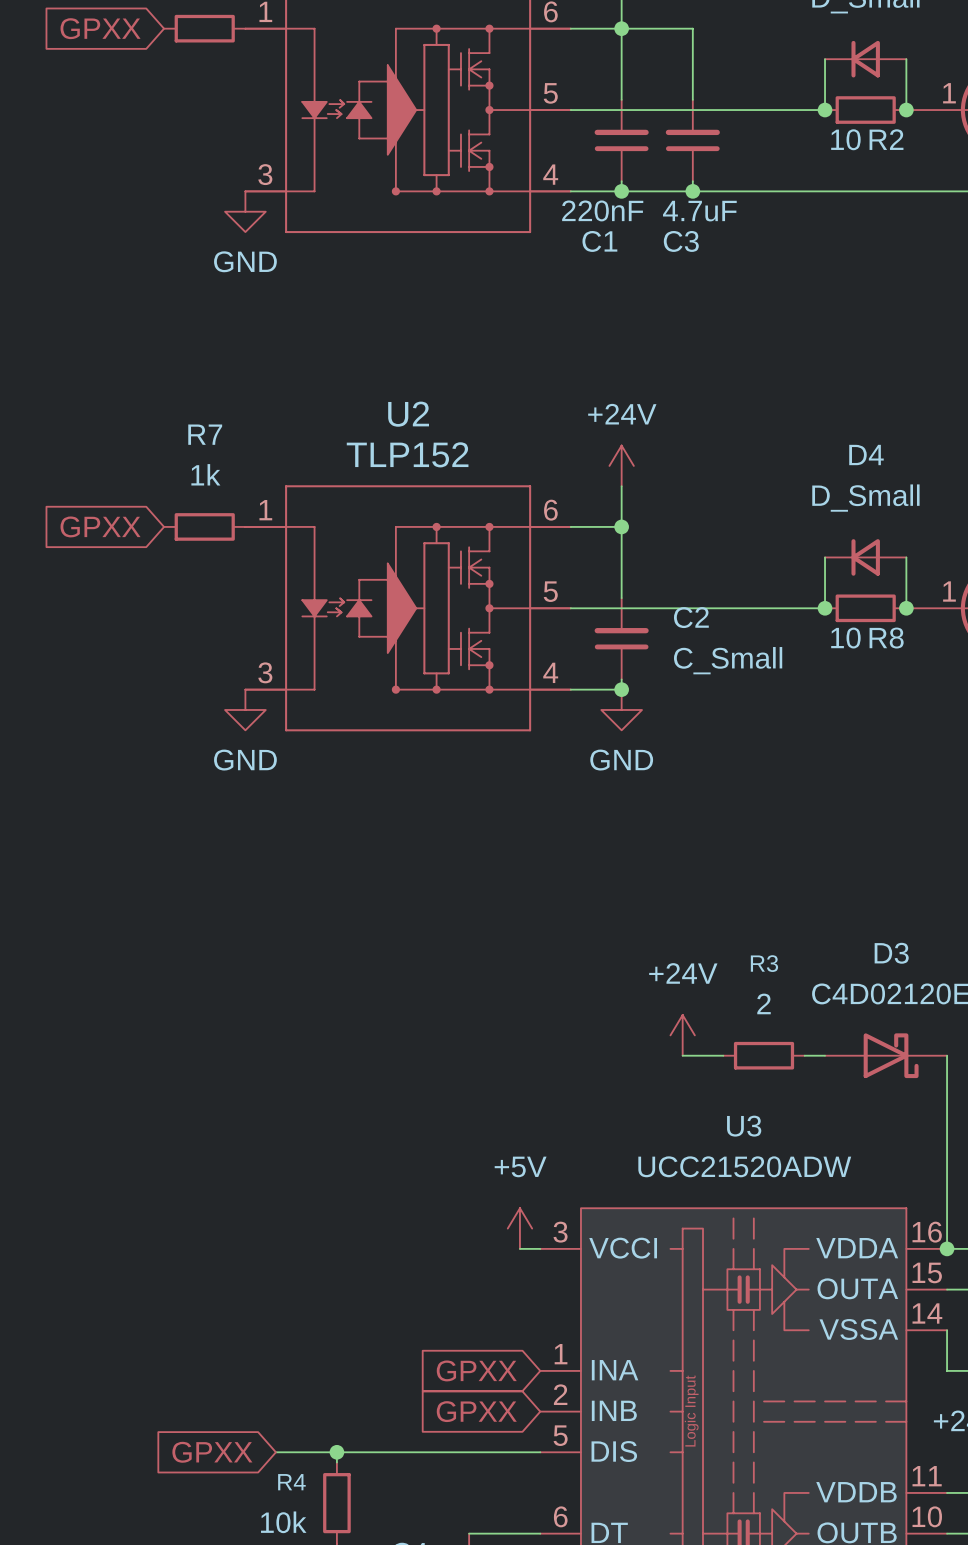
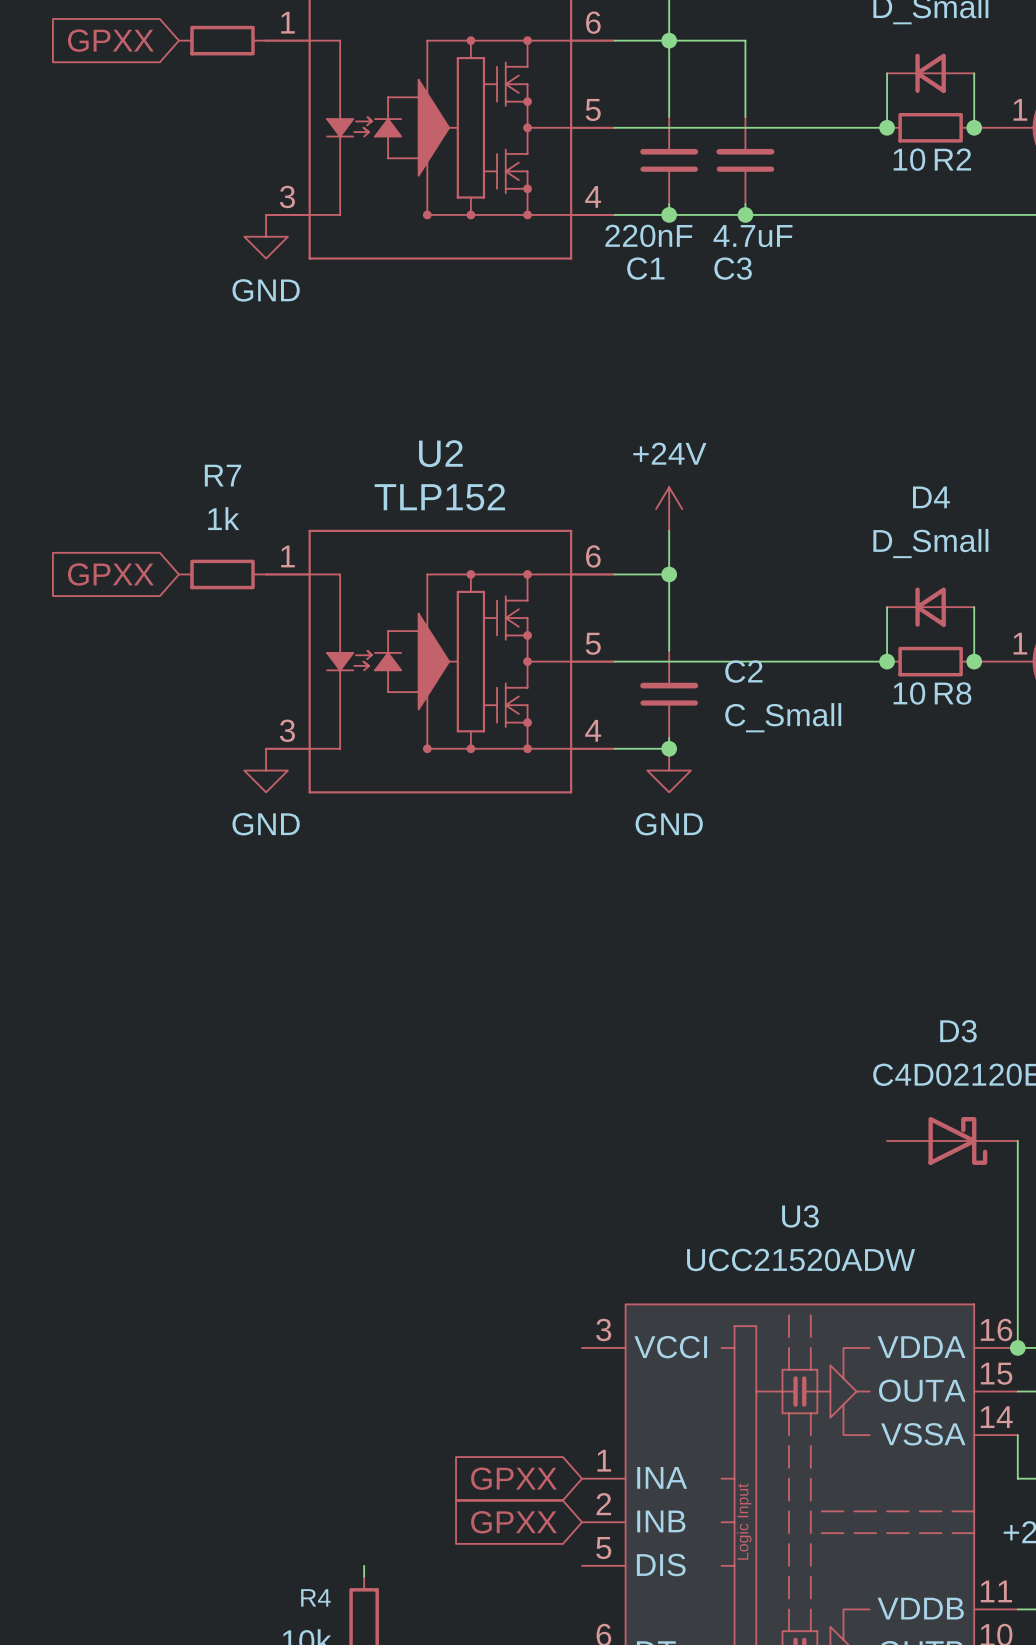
power symbol: +24V (682, 1035) -> none
wire: (682, 1055) (723, 1055) -> none
R3: 2 (764, 1055) -> none
wire: (804, 1055) (825, 1055) -> none
power symbol: +5V (519, 1228) -> none
wire: (519, 1248) (540, 1248) -> none
global label: GPXX (212, 1452) -> none
wire: (275, 1452) (540, 1452) -> none
junction: (336, 1452) -> none

